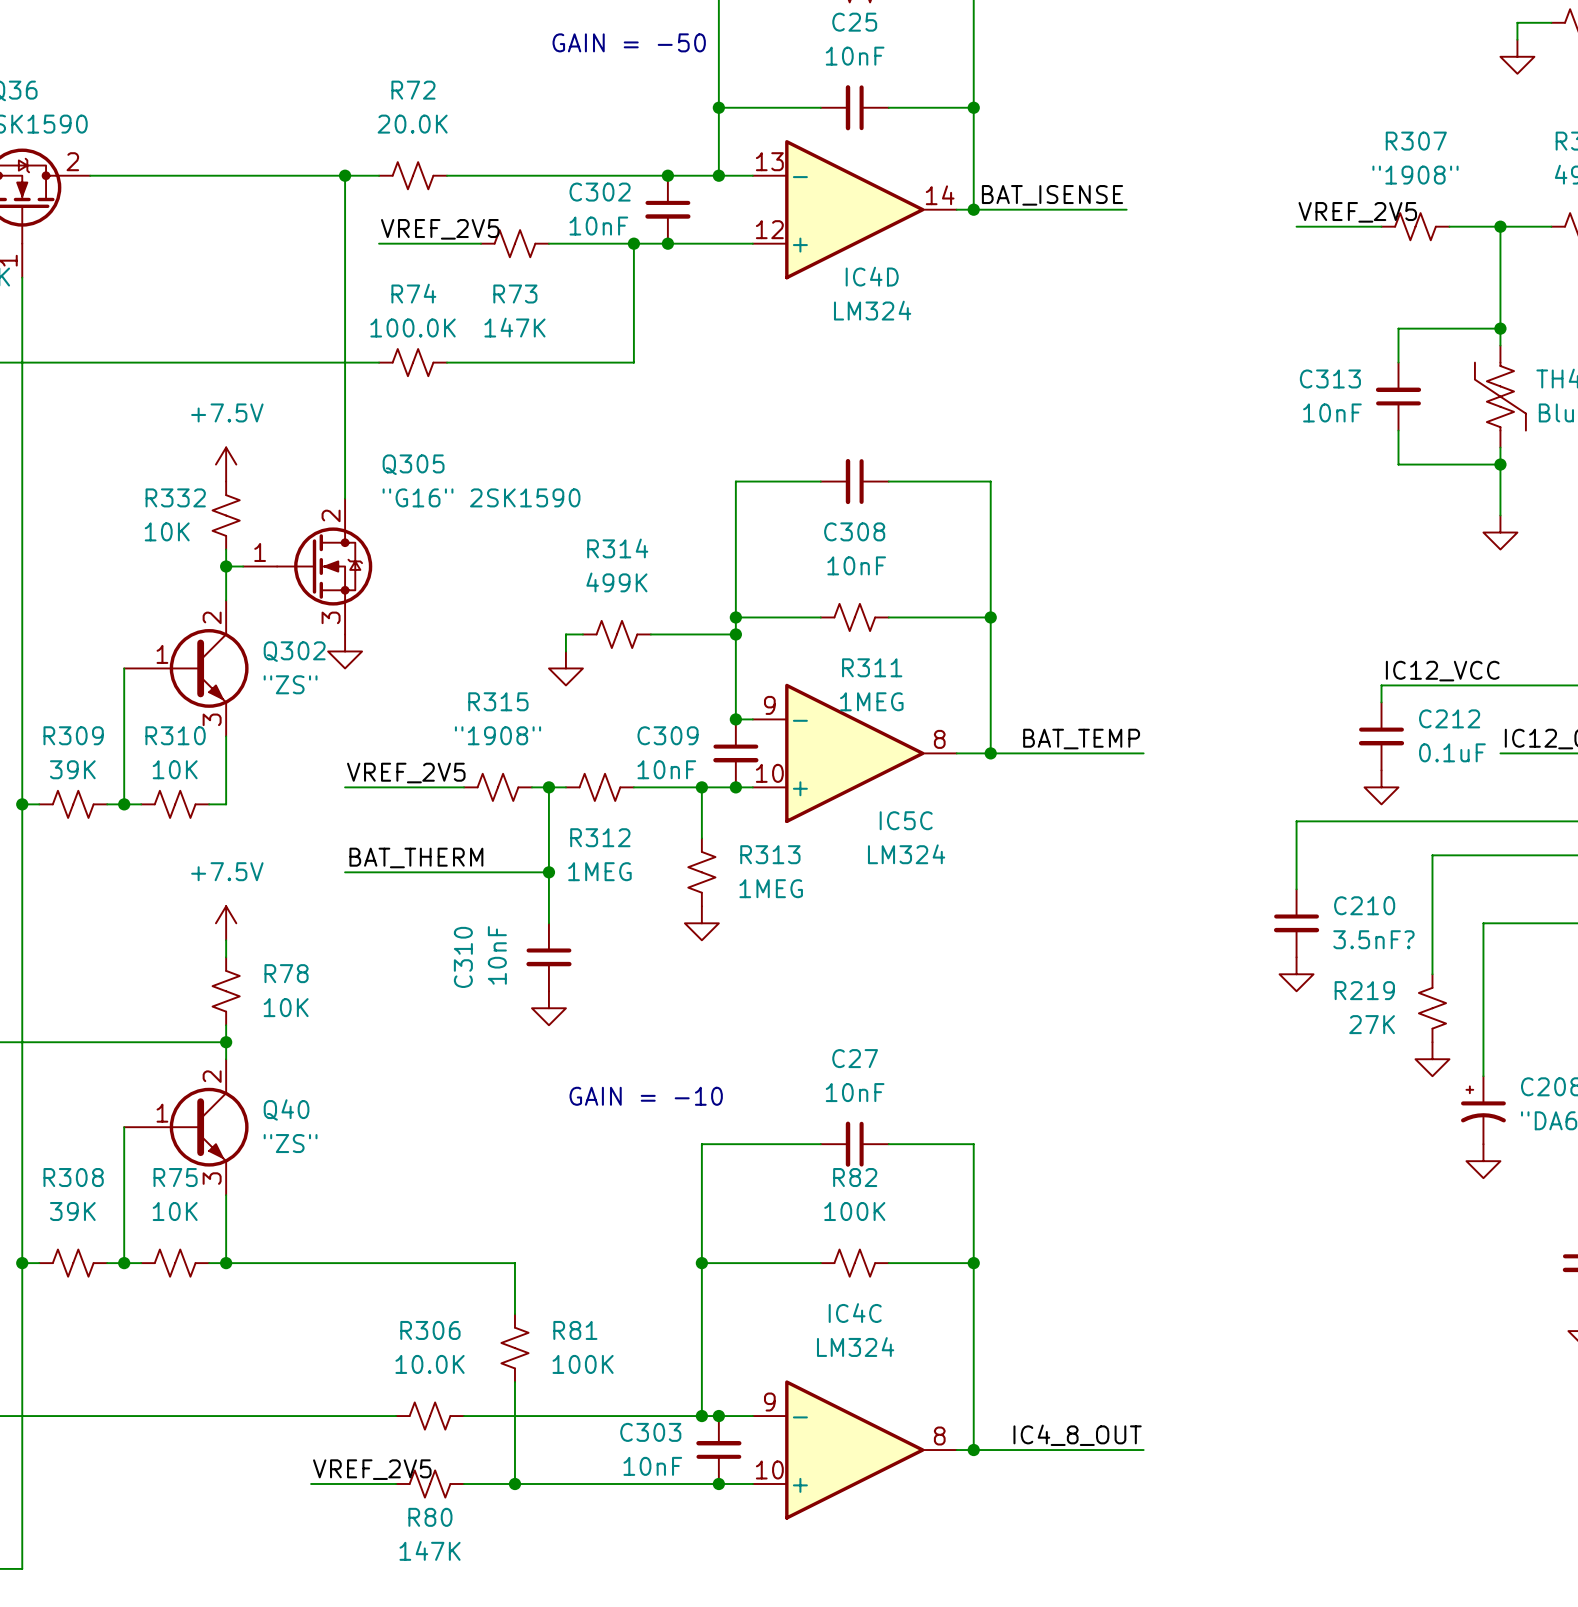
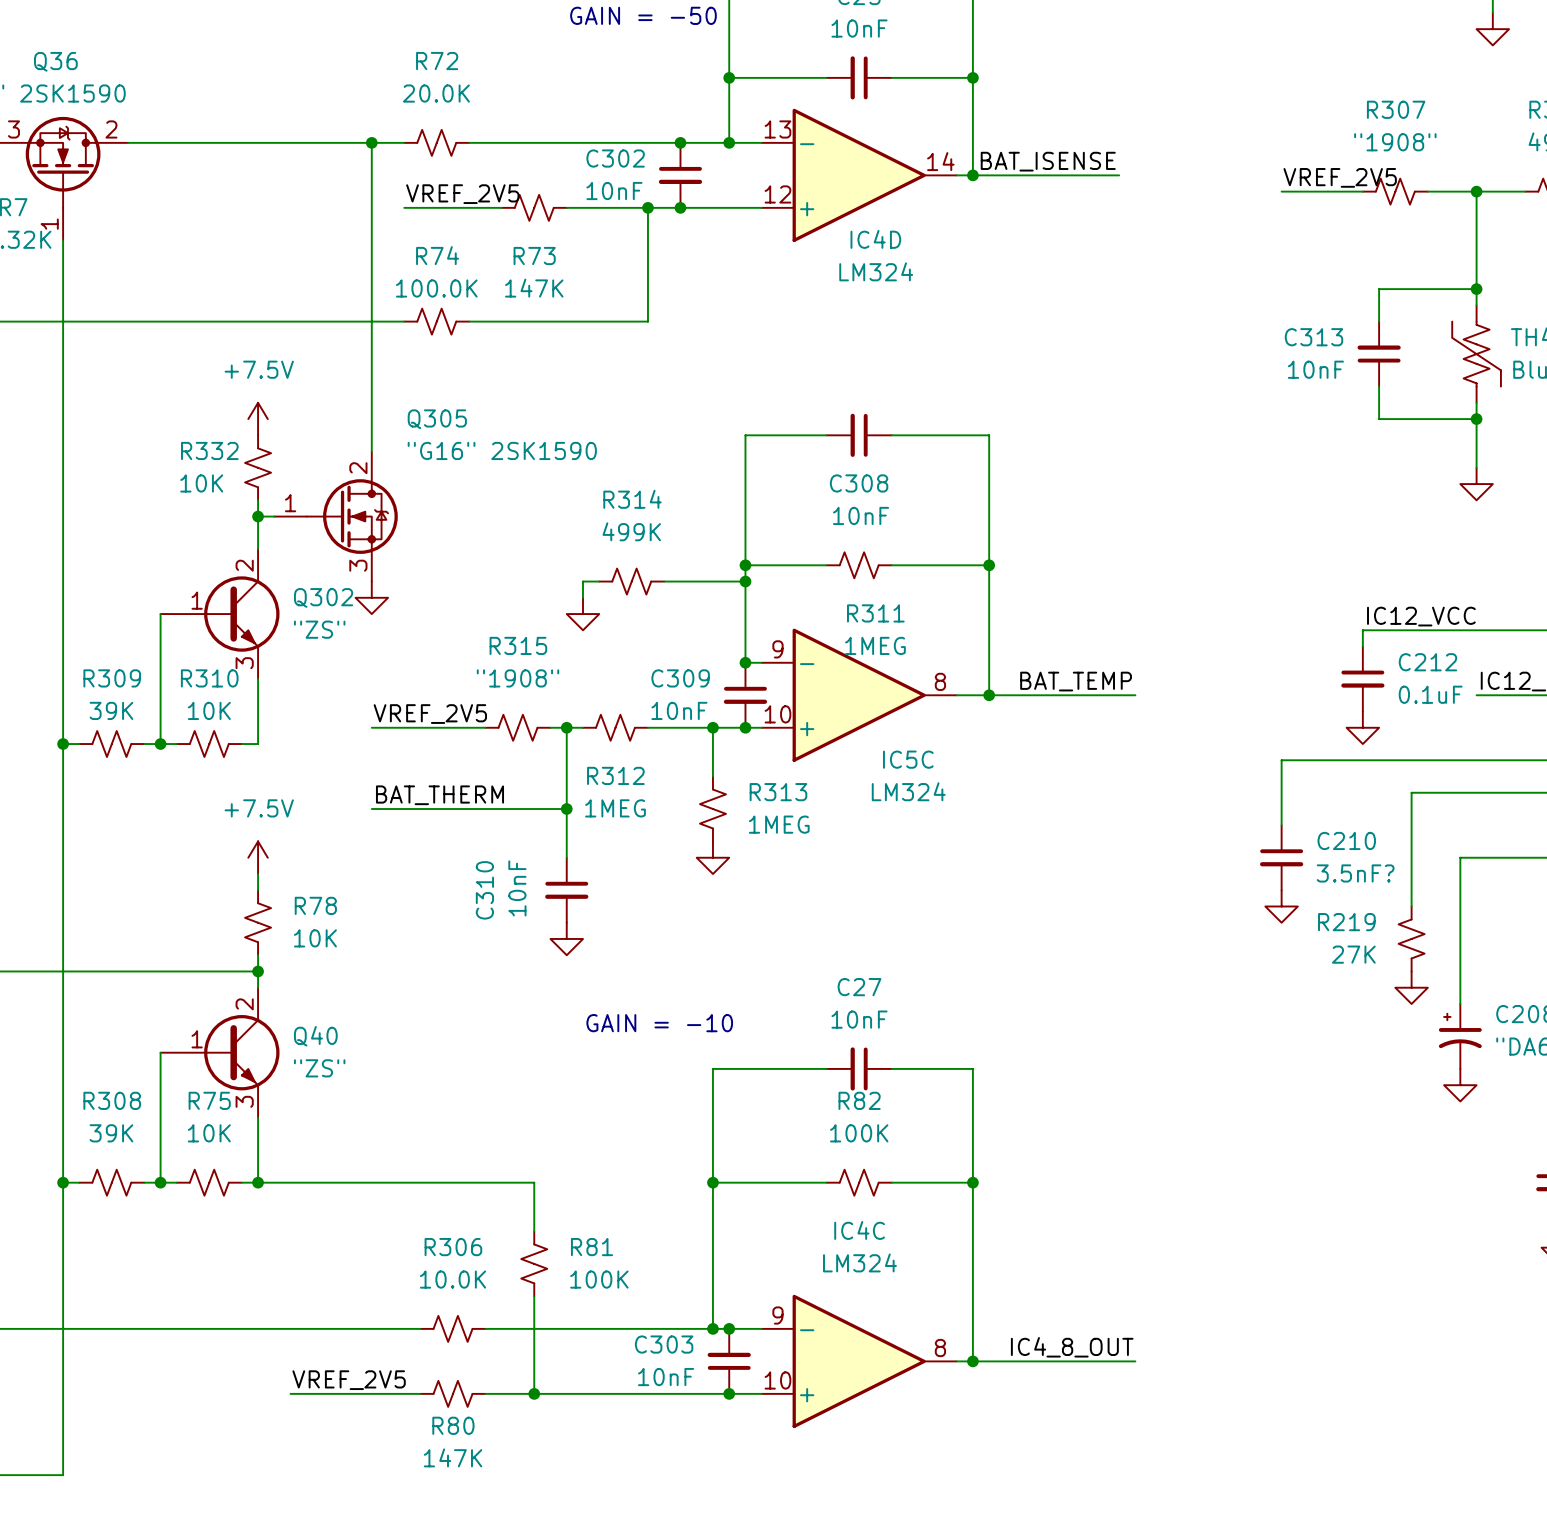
label position: VREF_2V5 (372, 1469) -> VREF_2V5 (349, 1380)
wire: none -> (290, 1393) (339, 1393)

